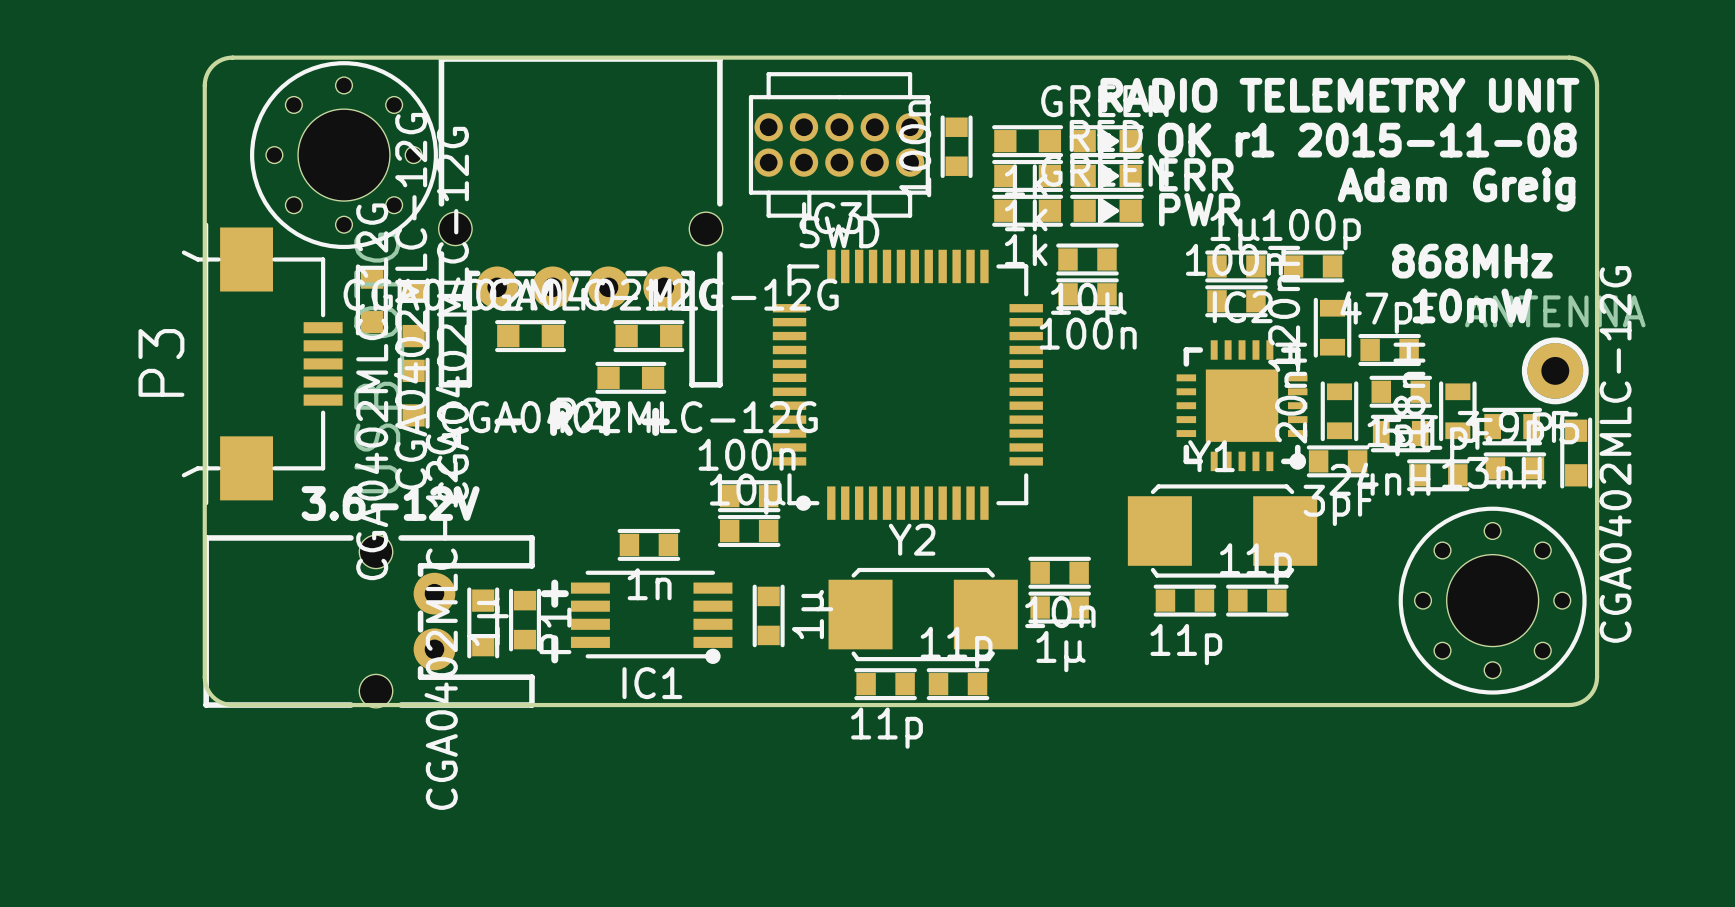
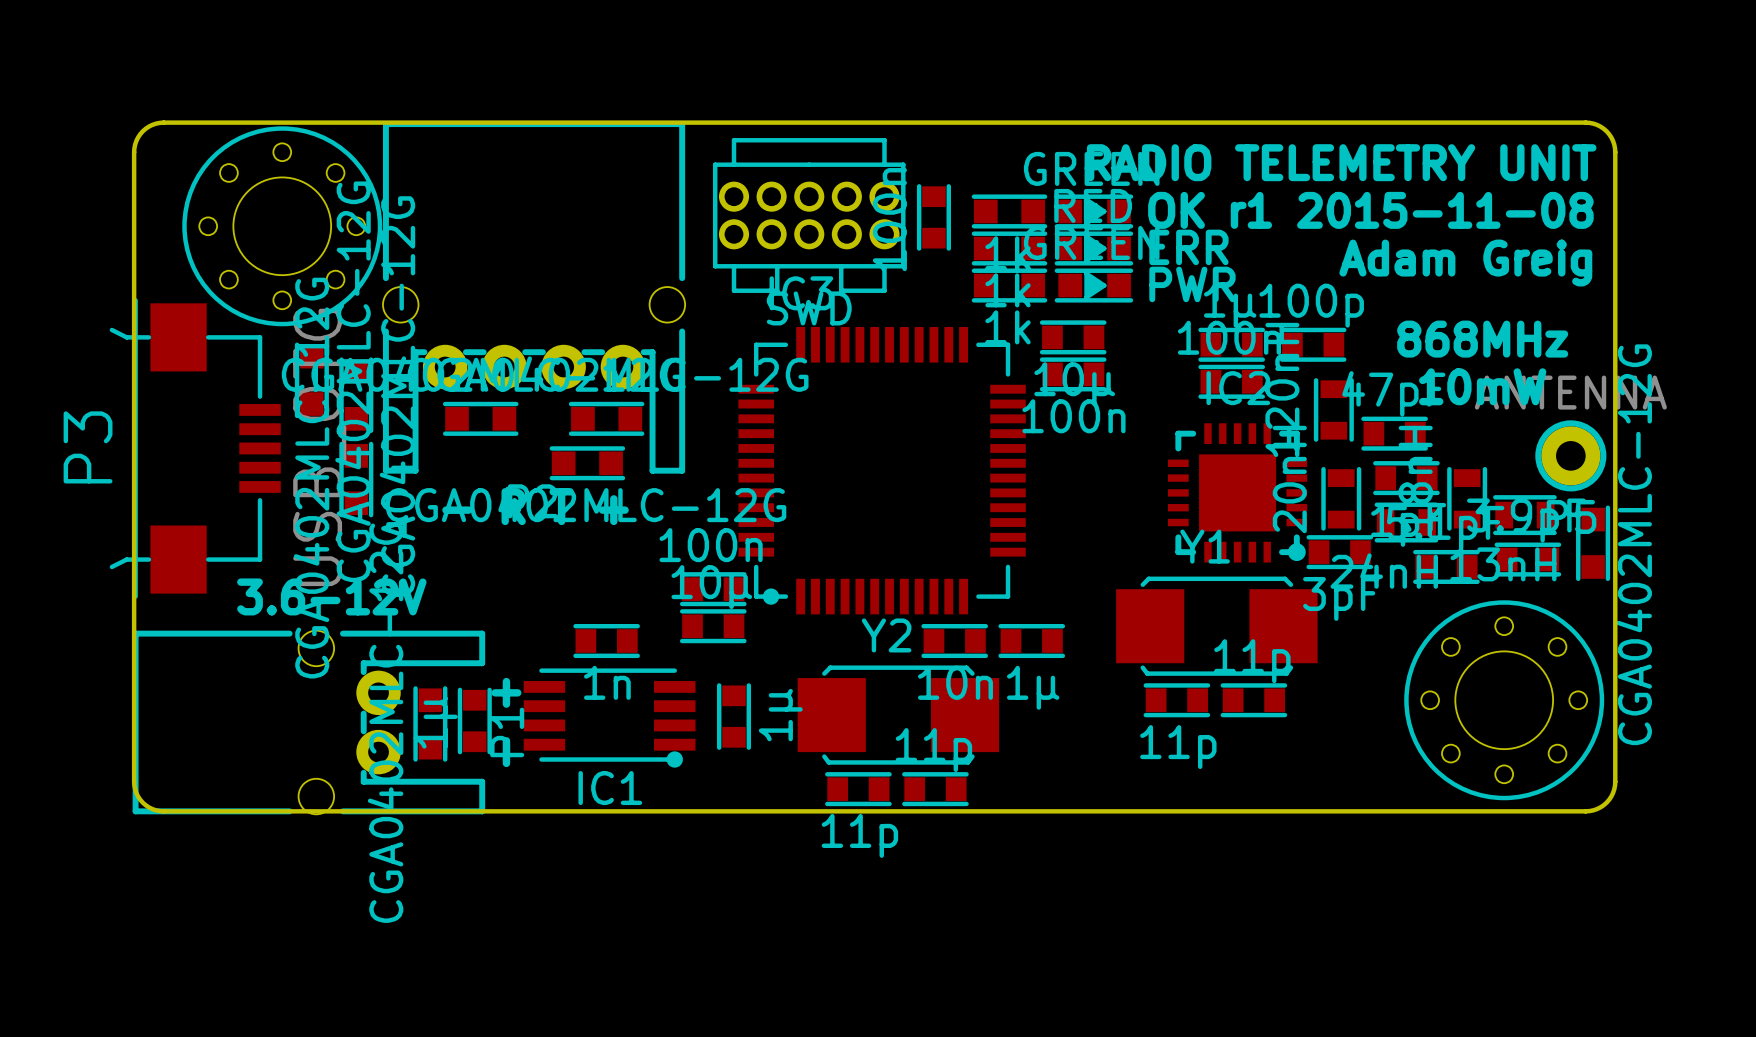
part position: (1059, 572) -> (954, 641)
part position: (1059, 607) -> (1031, 641)

